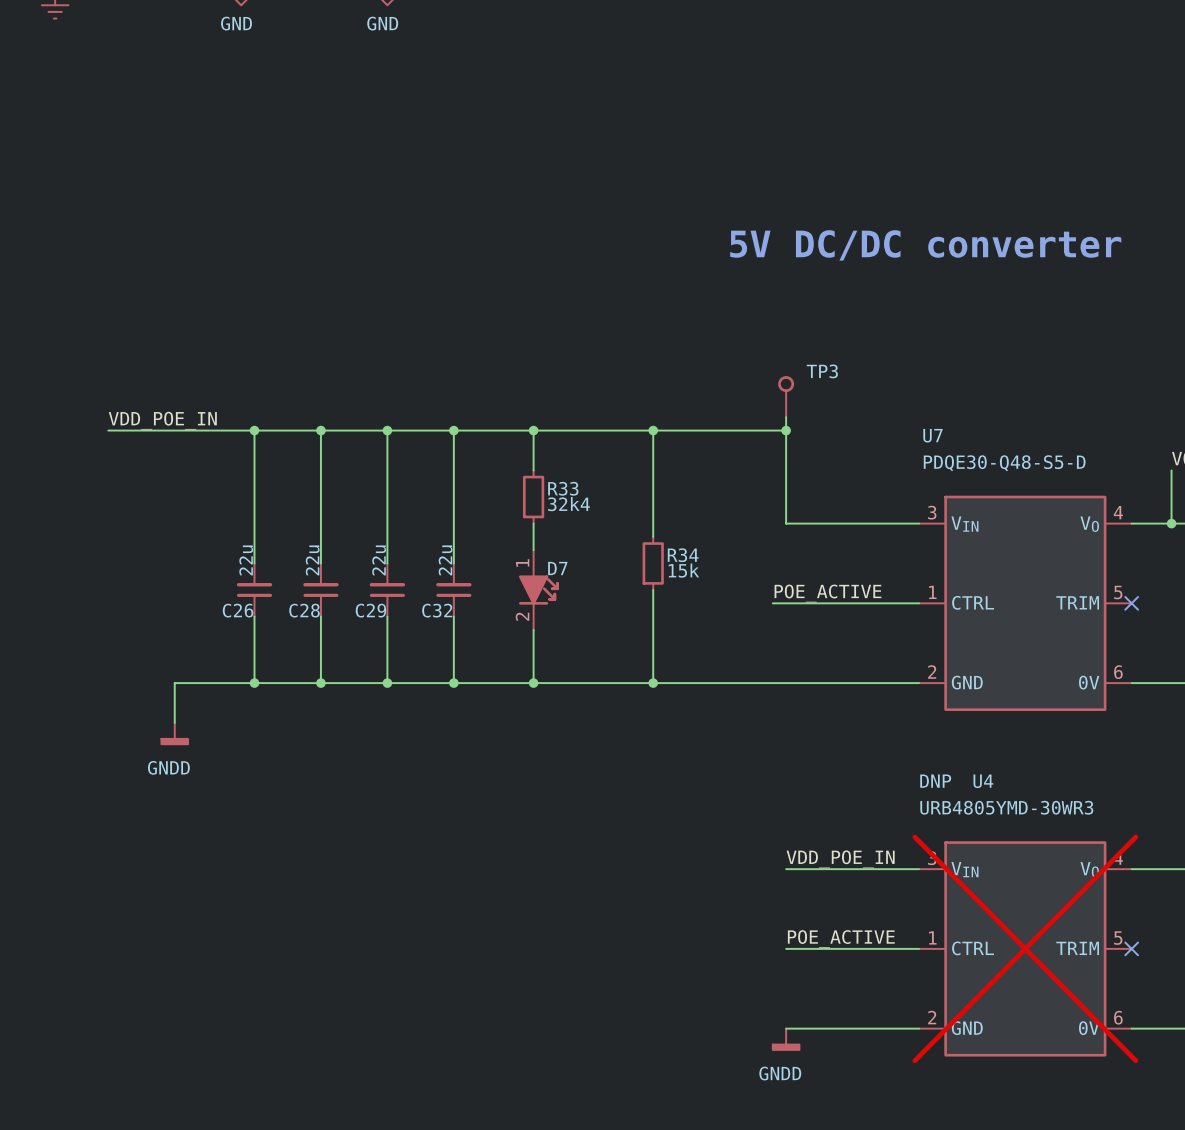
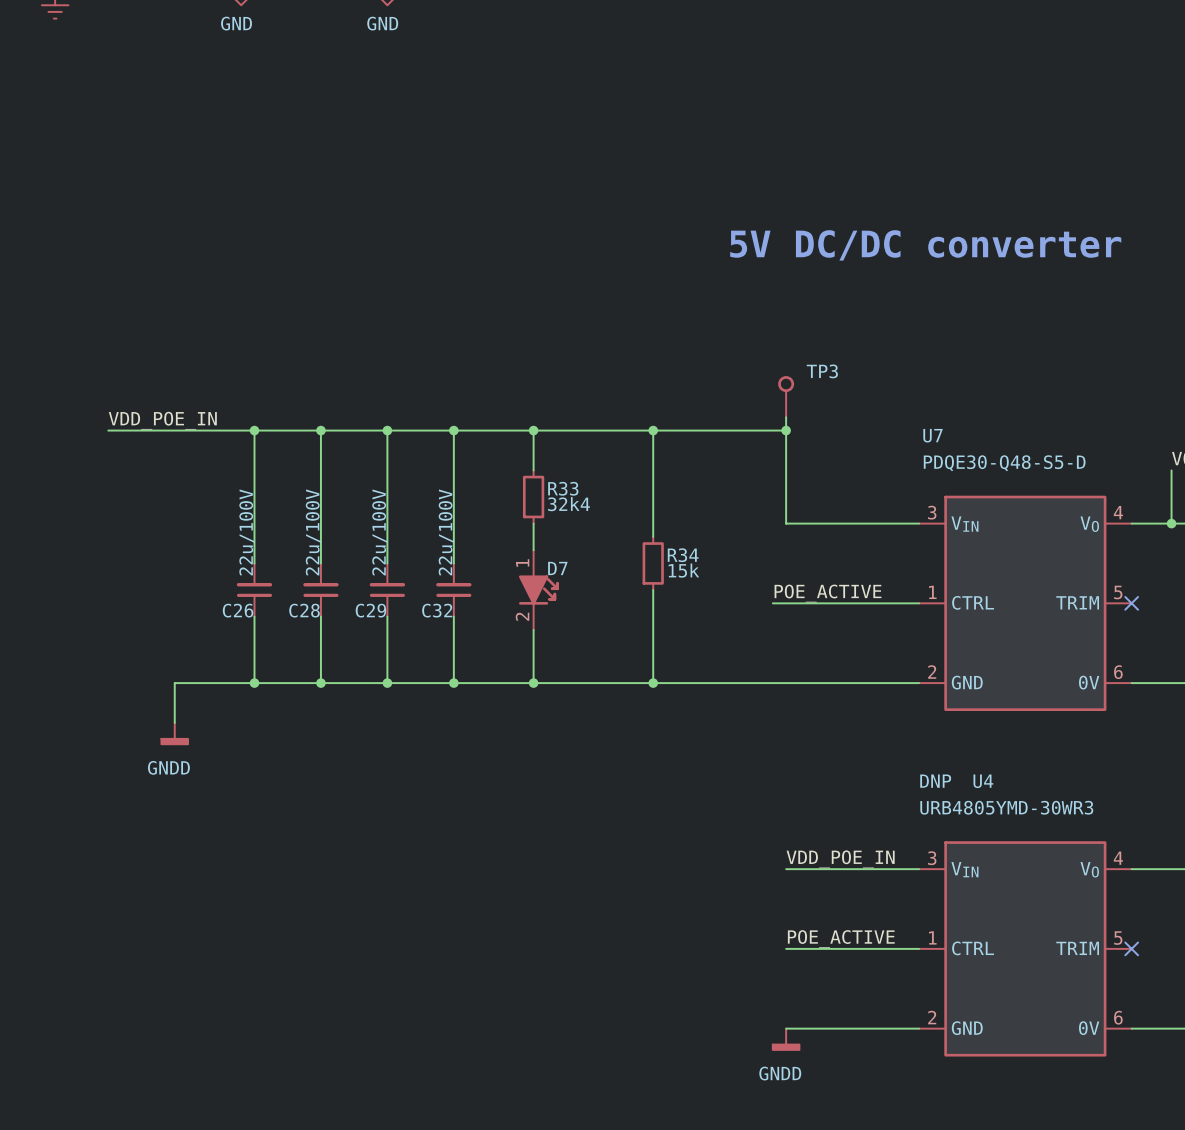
C26 text: 22u (246, 560) -> 22u/100V (246, 532)
C28 text: 22u (312, 560) -> 22u/100V (313, 532)
C29 text: 22u (379, 560) -> 22u/100V (379, 532)
C32 text: 22u (445, 560) -> 22u/100V (446, 532)
U4 do-not-place cross: (1025, 948) -> none

